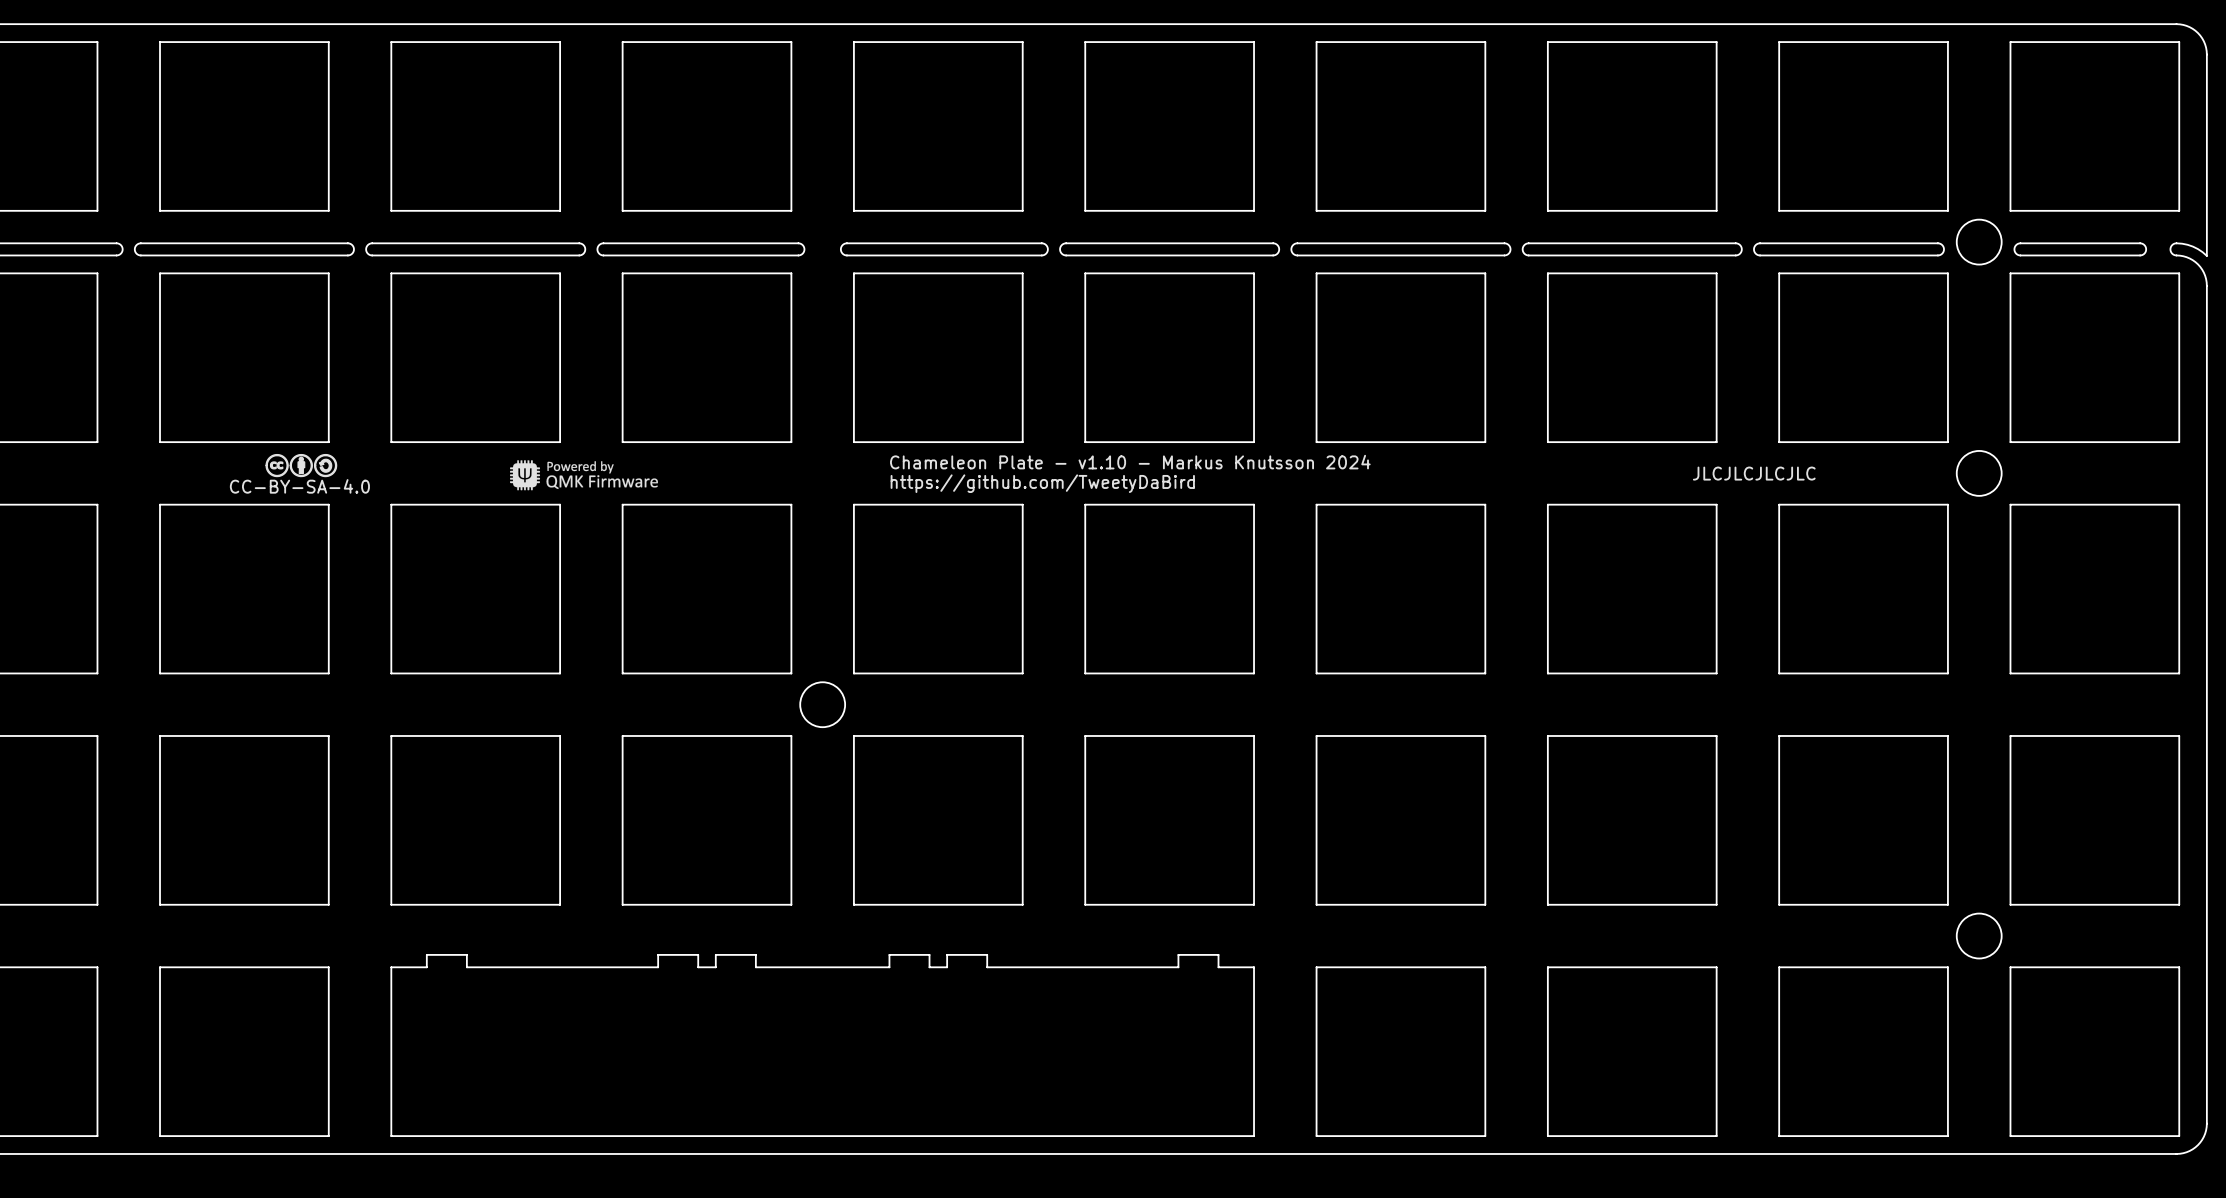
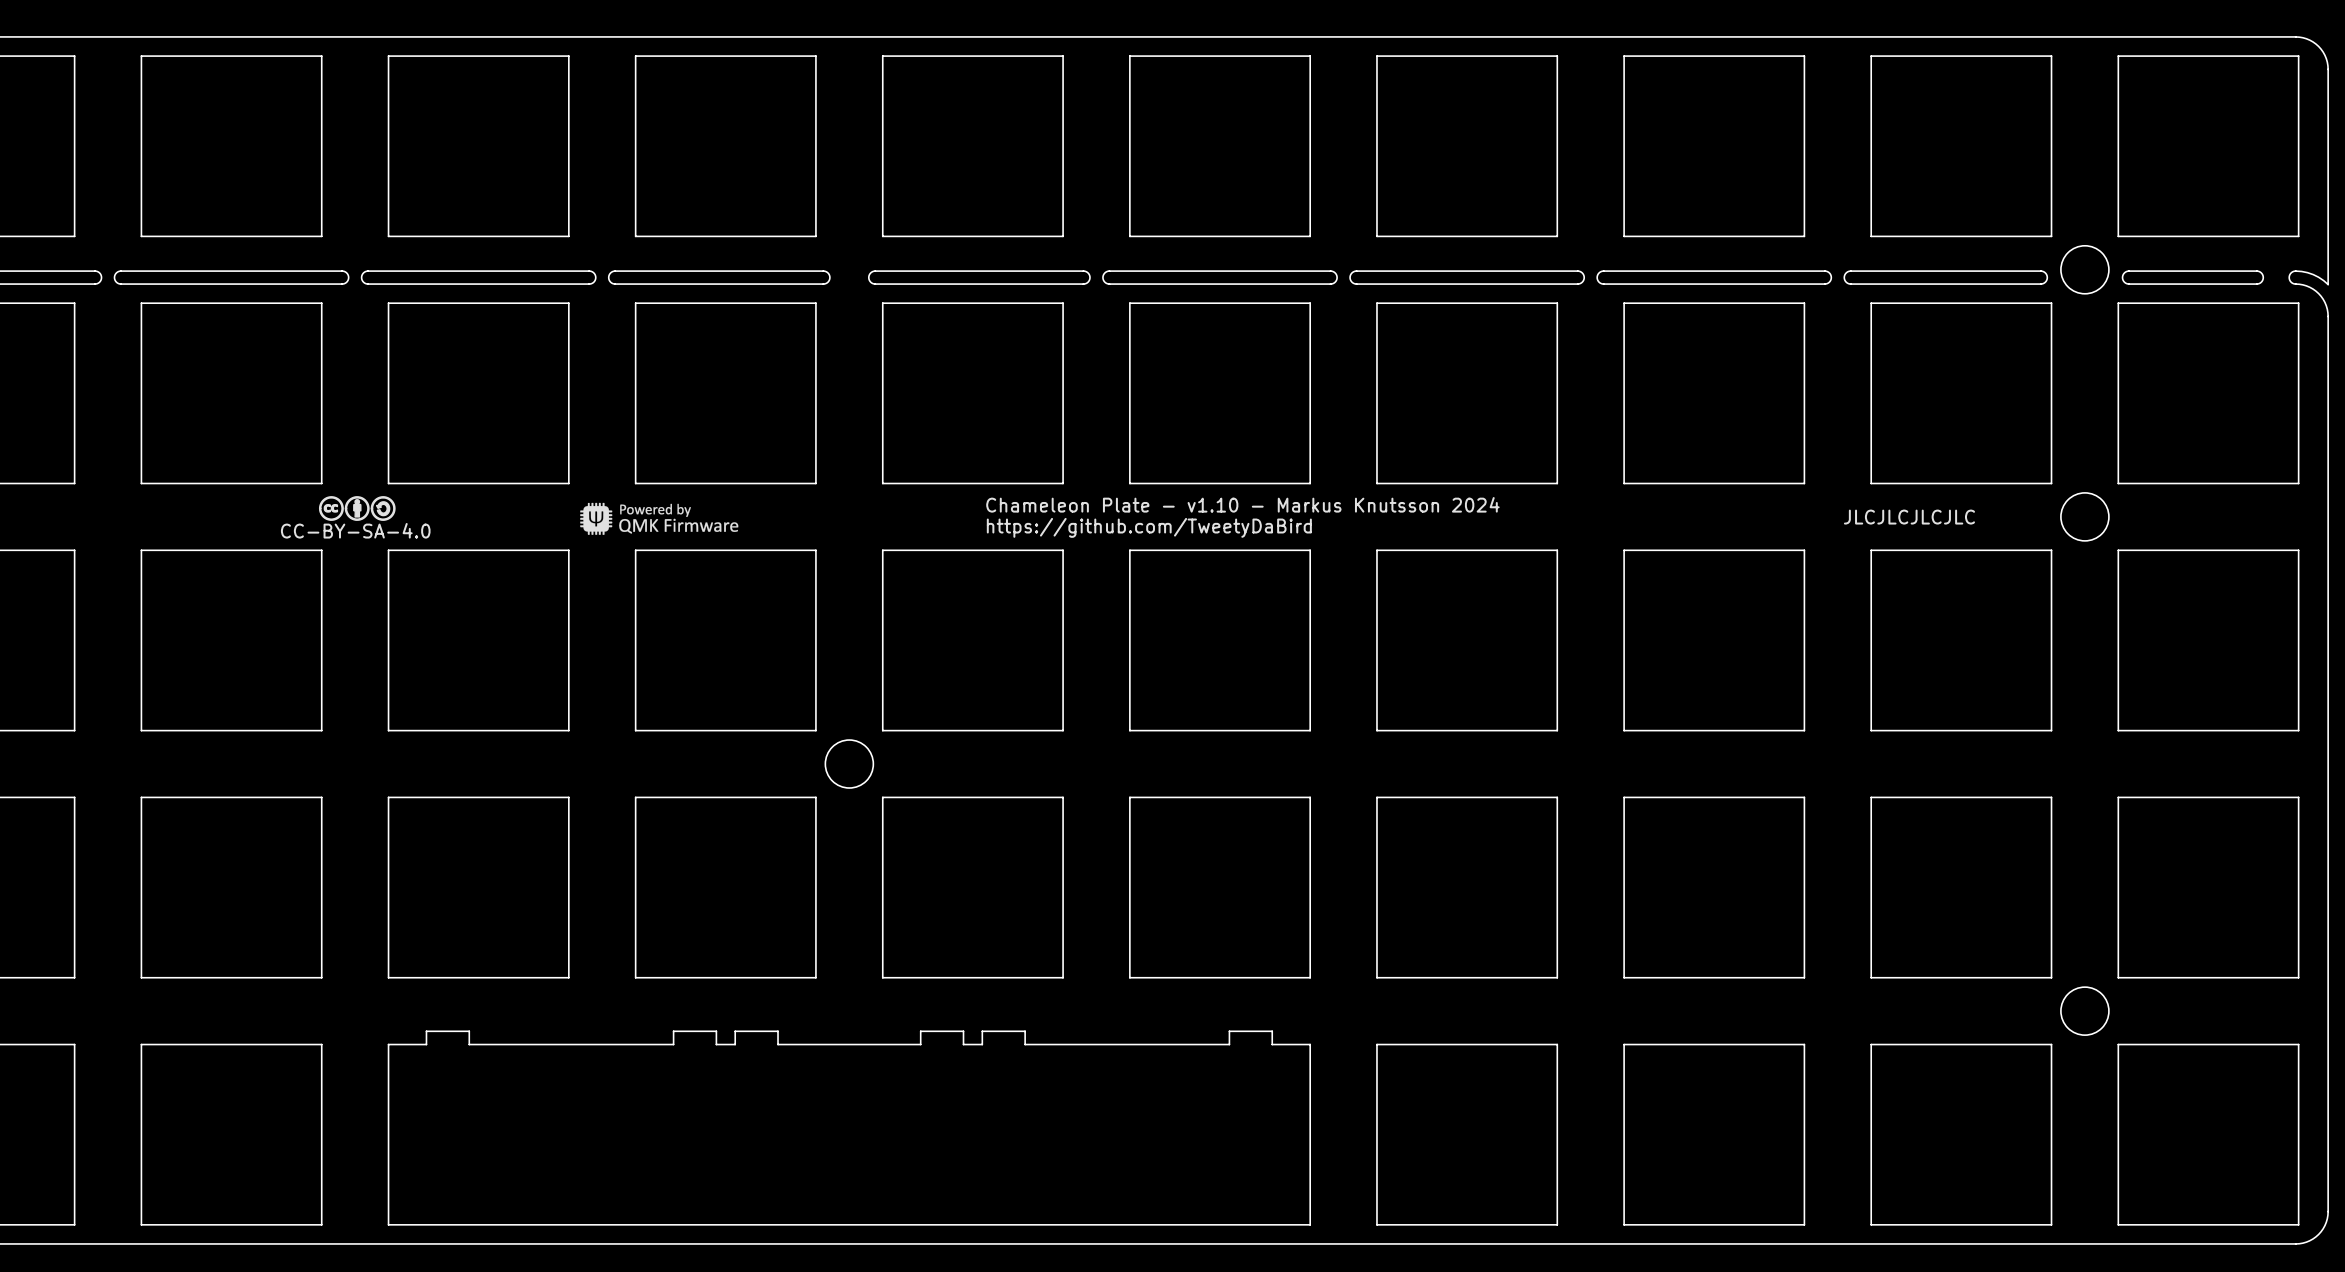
text position: Chameleon Plate - v1.10 - Markus Knutsson 2024 (1130, 462) -> Chameleon Plate - v1.10 - Markus Knutsson 2024 (1242, 504)
drawing position: (301, 465) -> (357, 508)
text position: JLCJLCJLCJLC (1754, 473) -> JLCJLCJLCJLC (1909, 517)
drawing position: (584, 475) -> (659, 518)
text position: https://github.com/TweetyDaBird (1042, 483) -> https://github.com/TweetyDaBird (1149, 527)

